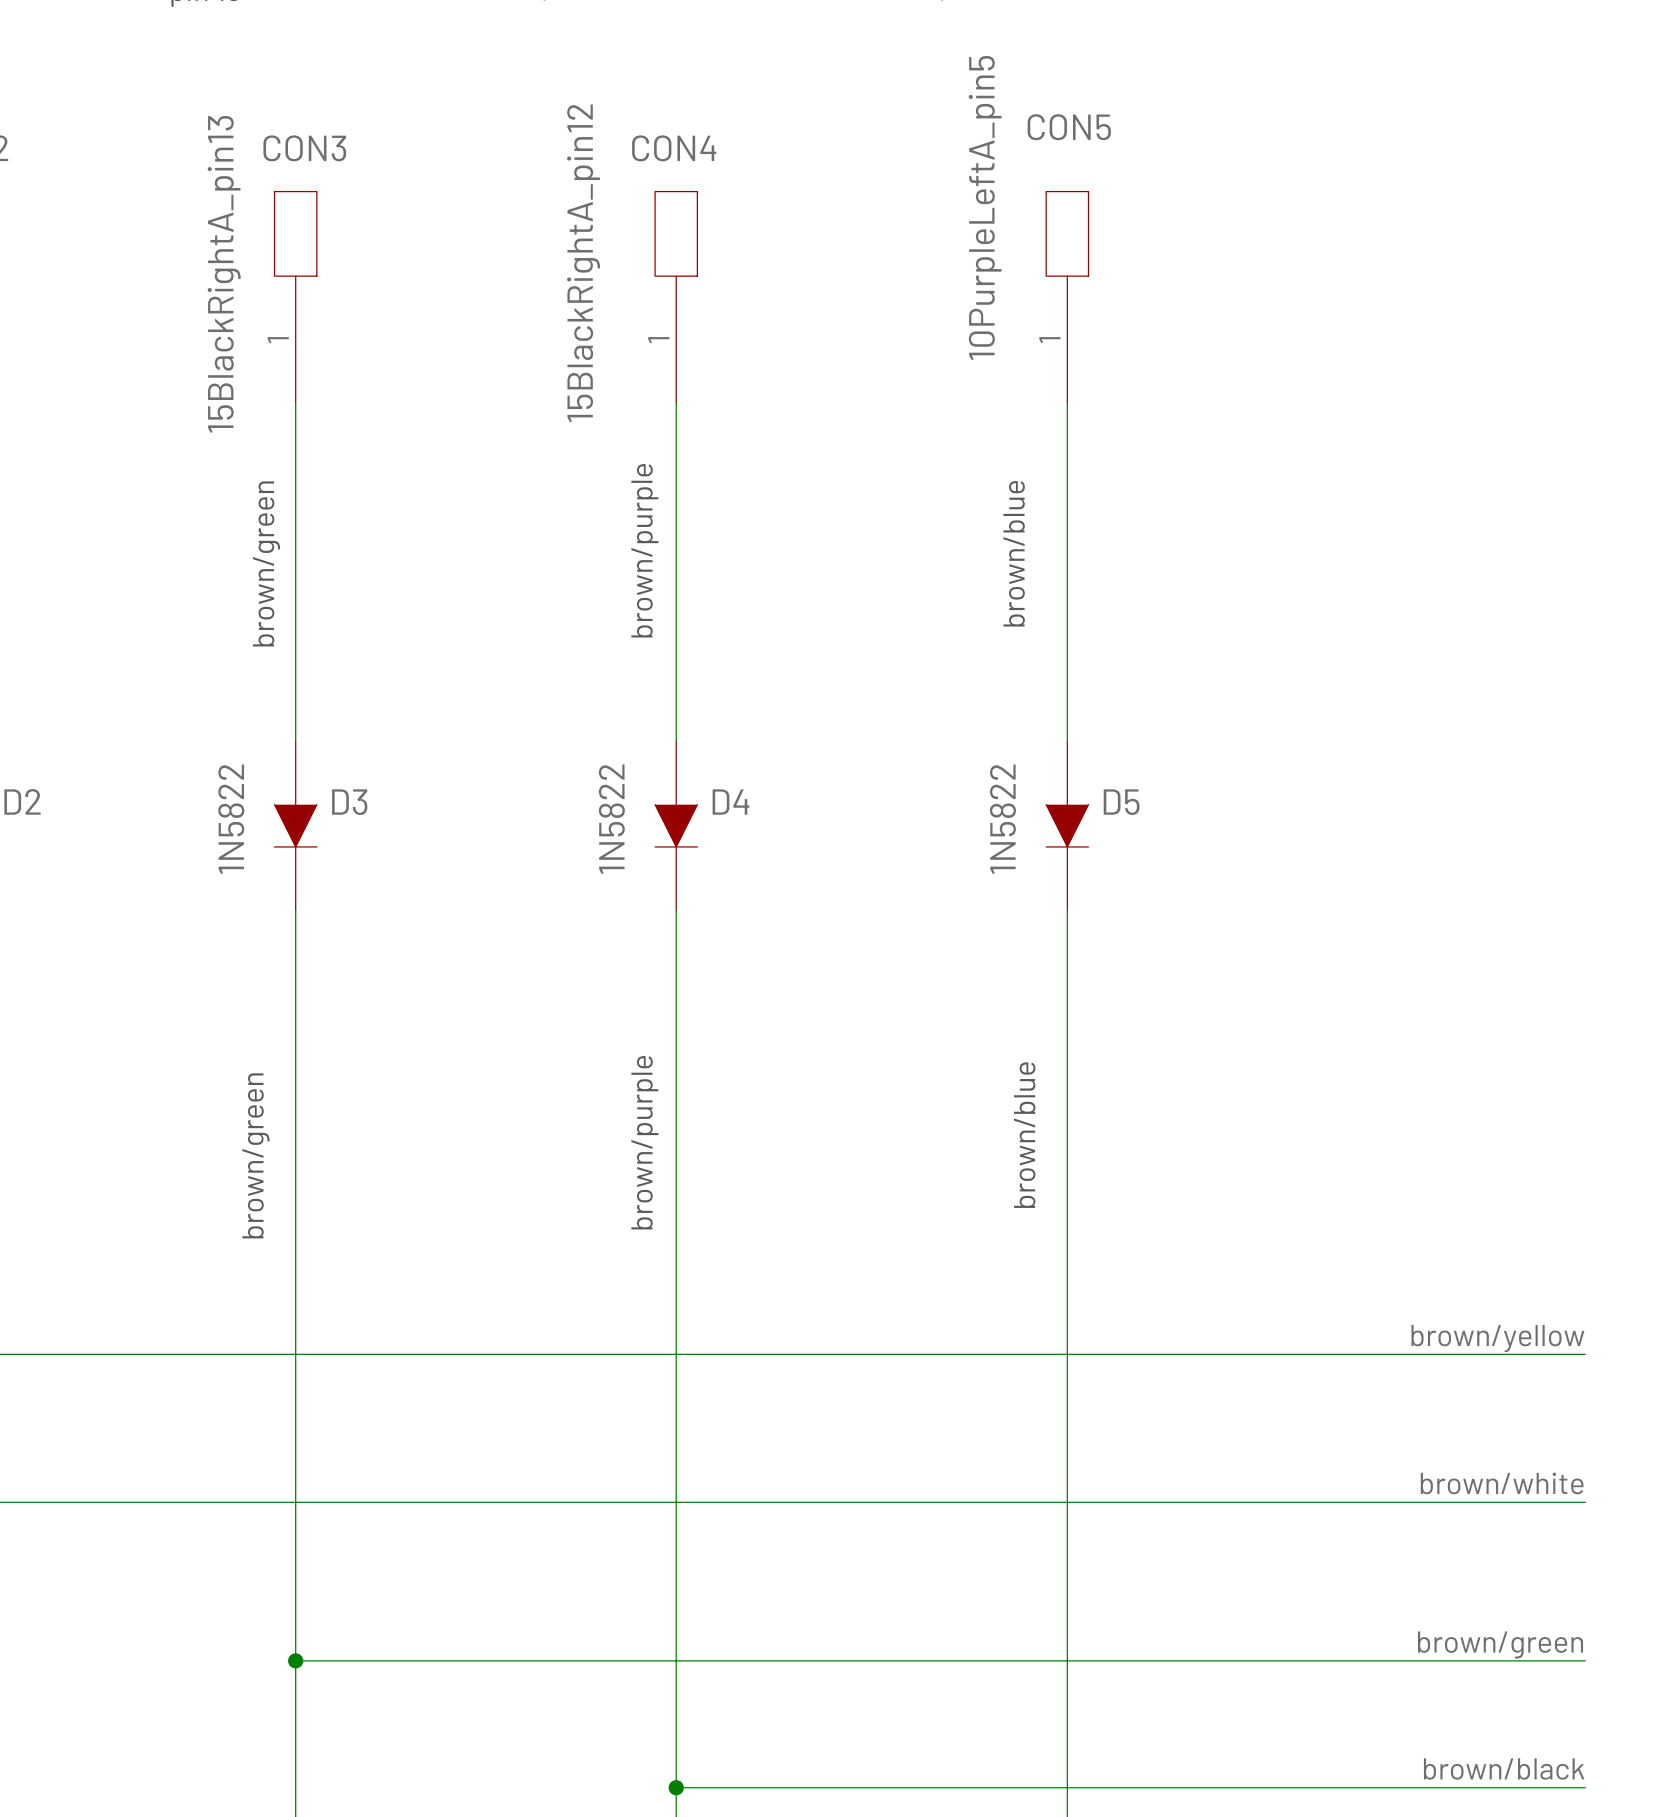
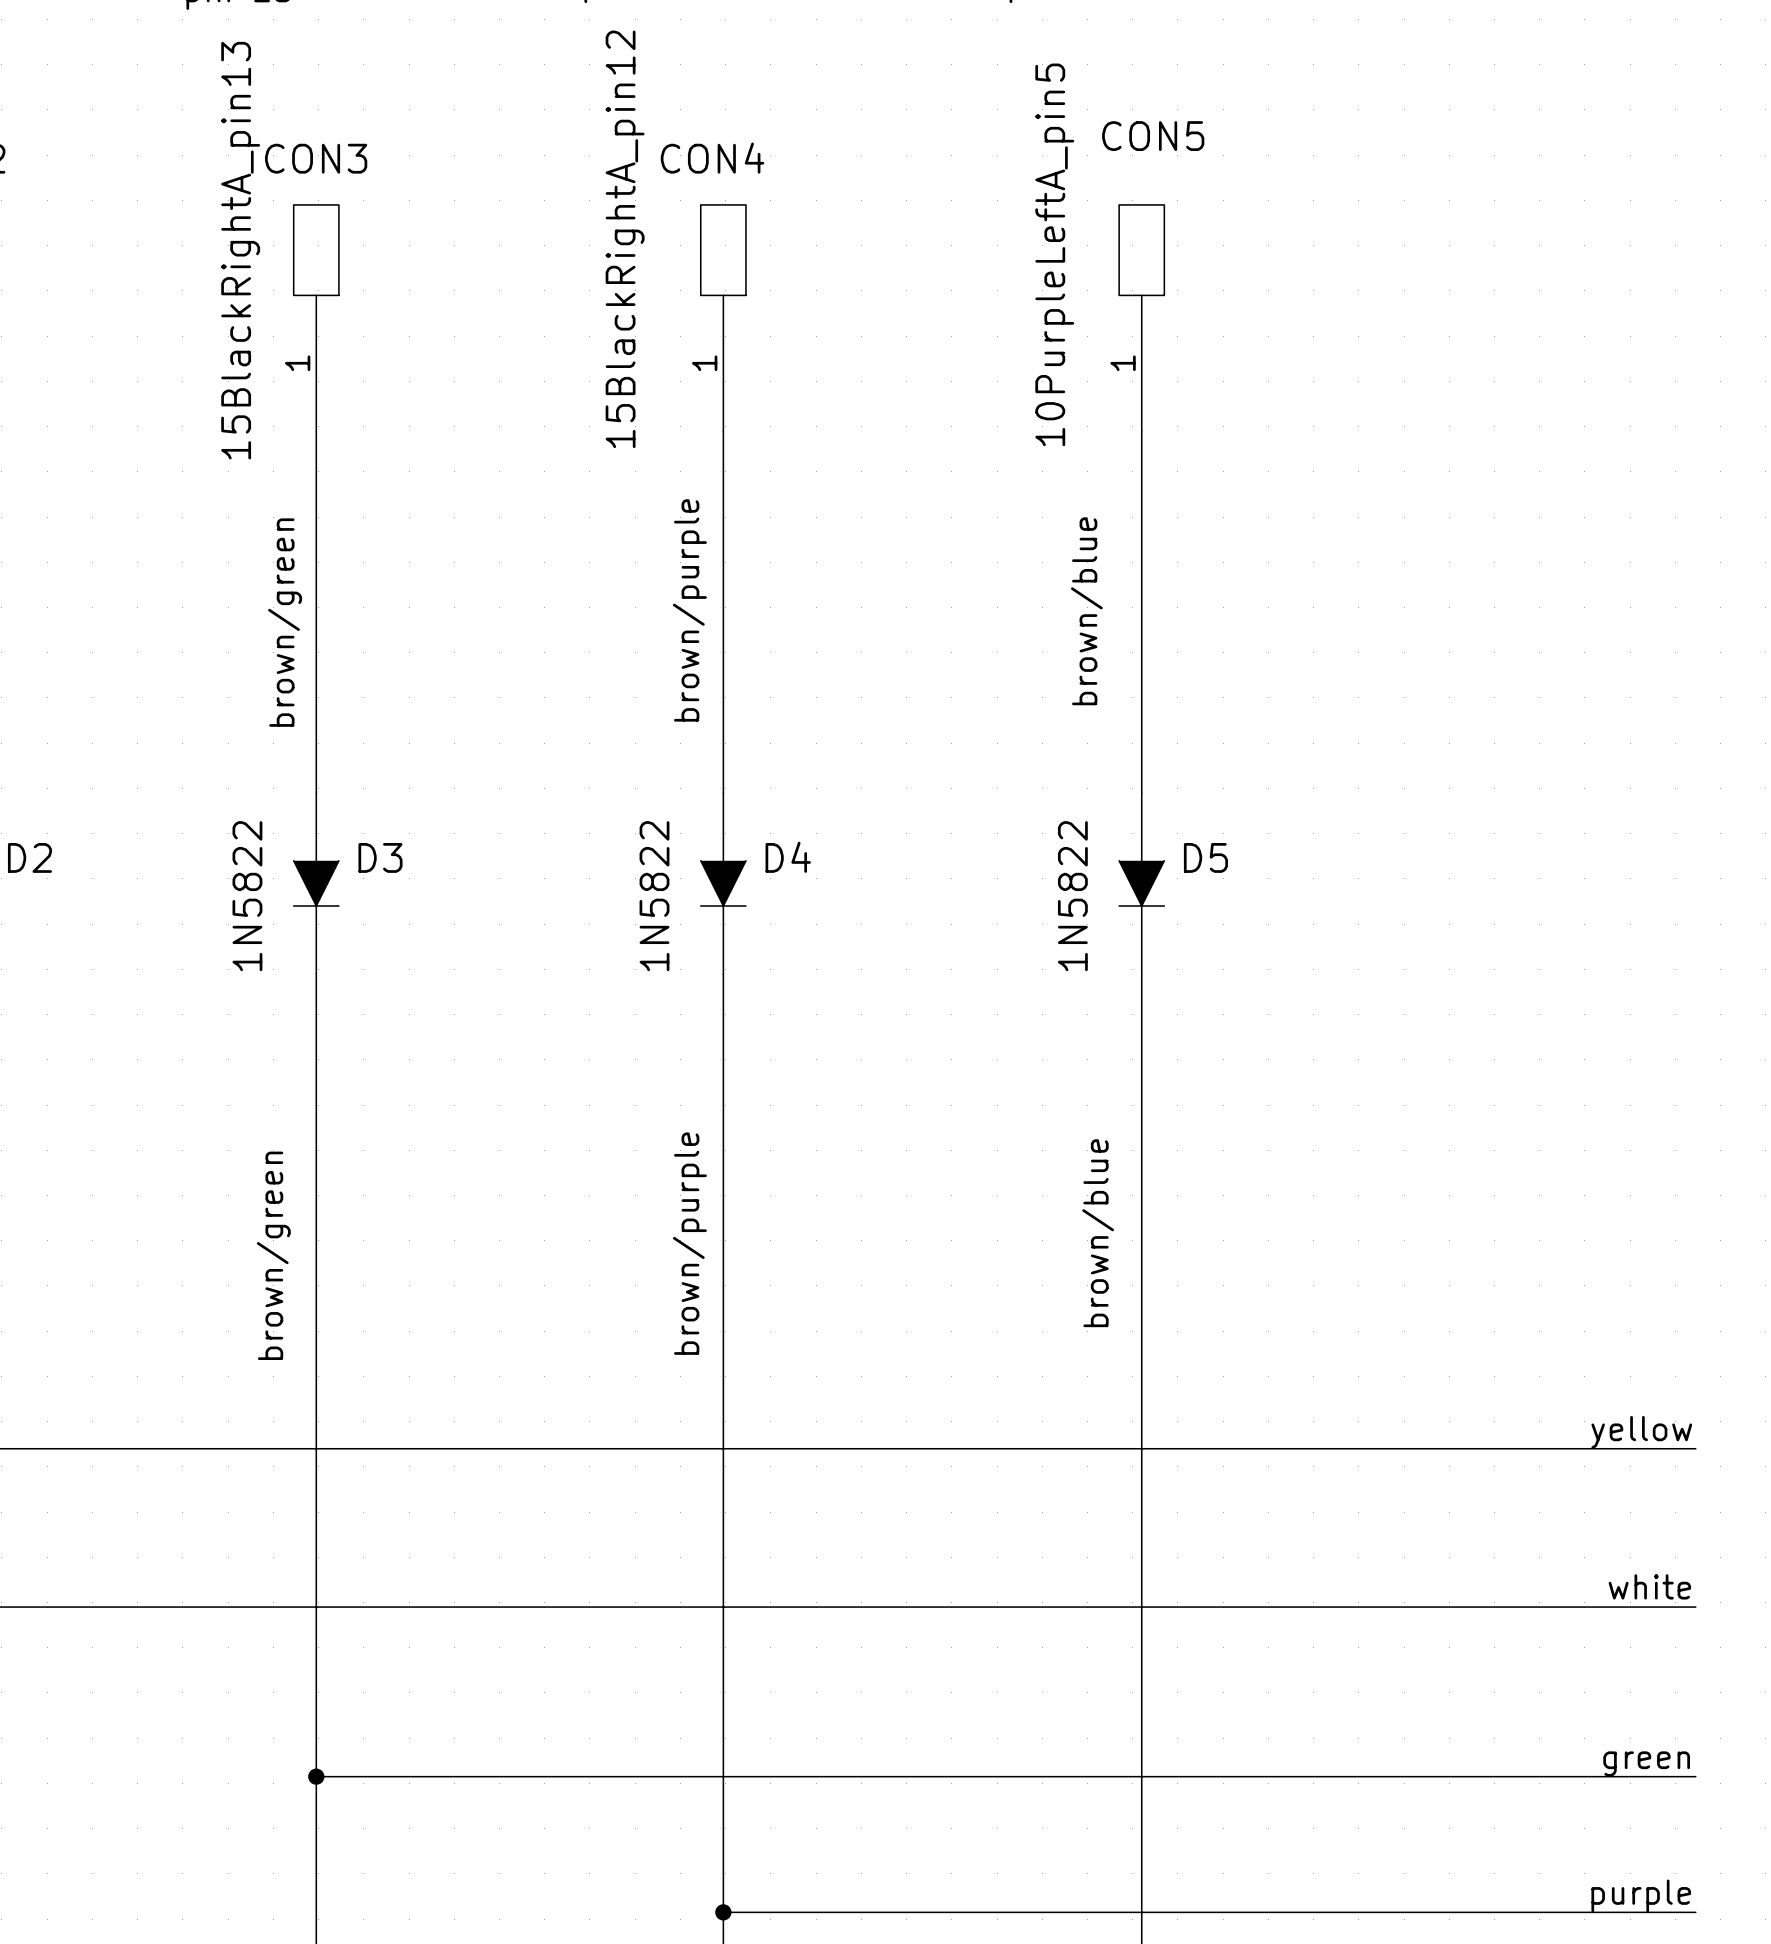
label: brown/yellow (1497, 1338) -> yellow (1641, 1432)
label: brown/white (1502, 1483) -> white (1649, 1586)
label: brown/green (1500, 1645) -> green (1646, 1764)
label: brown/black (1504, 1768) -> purple (1641, 1895)

